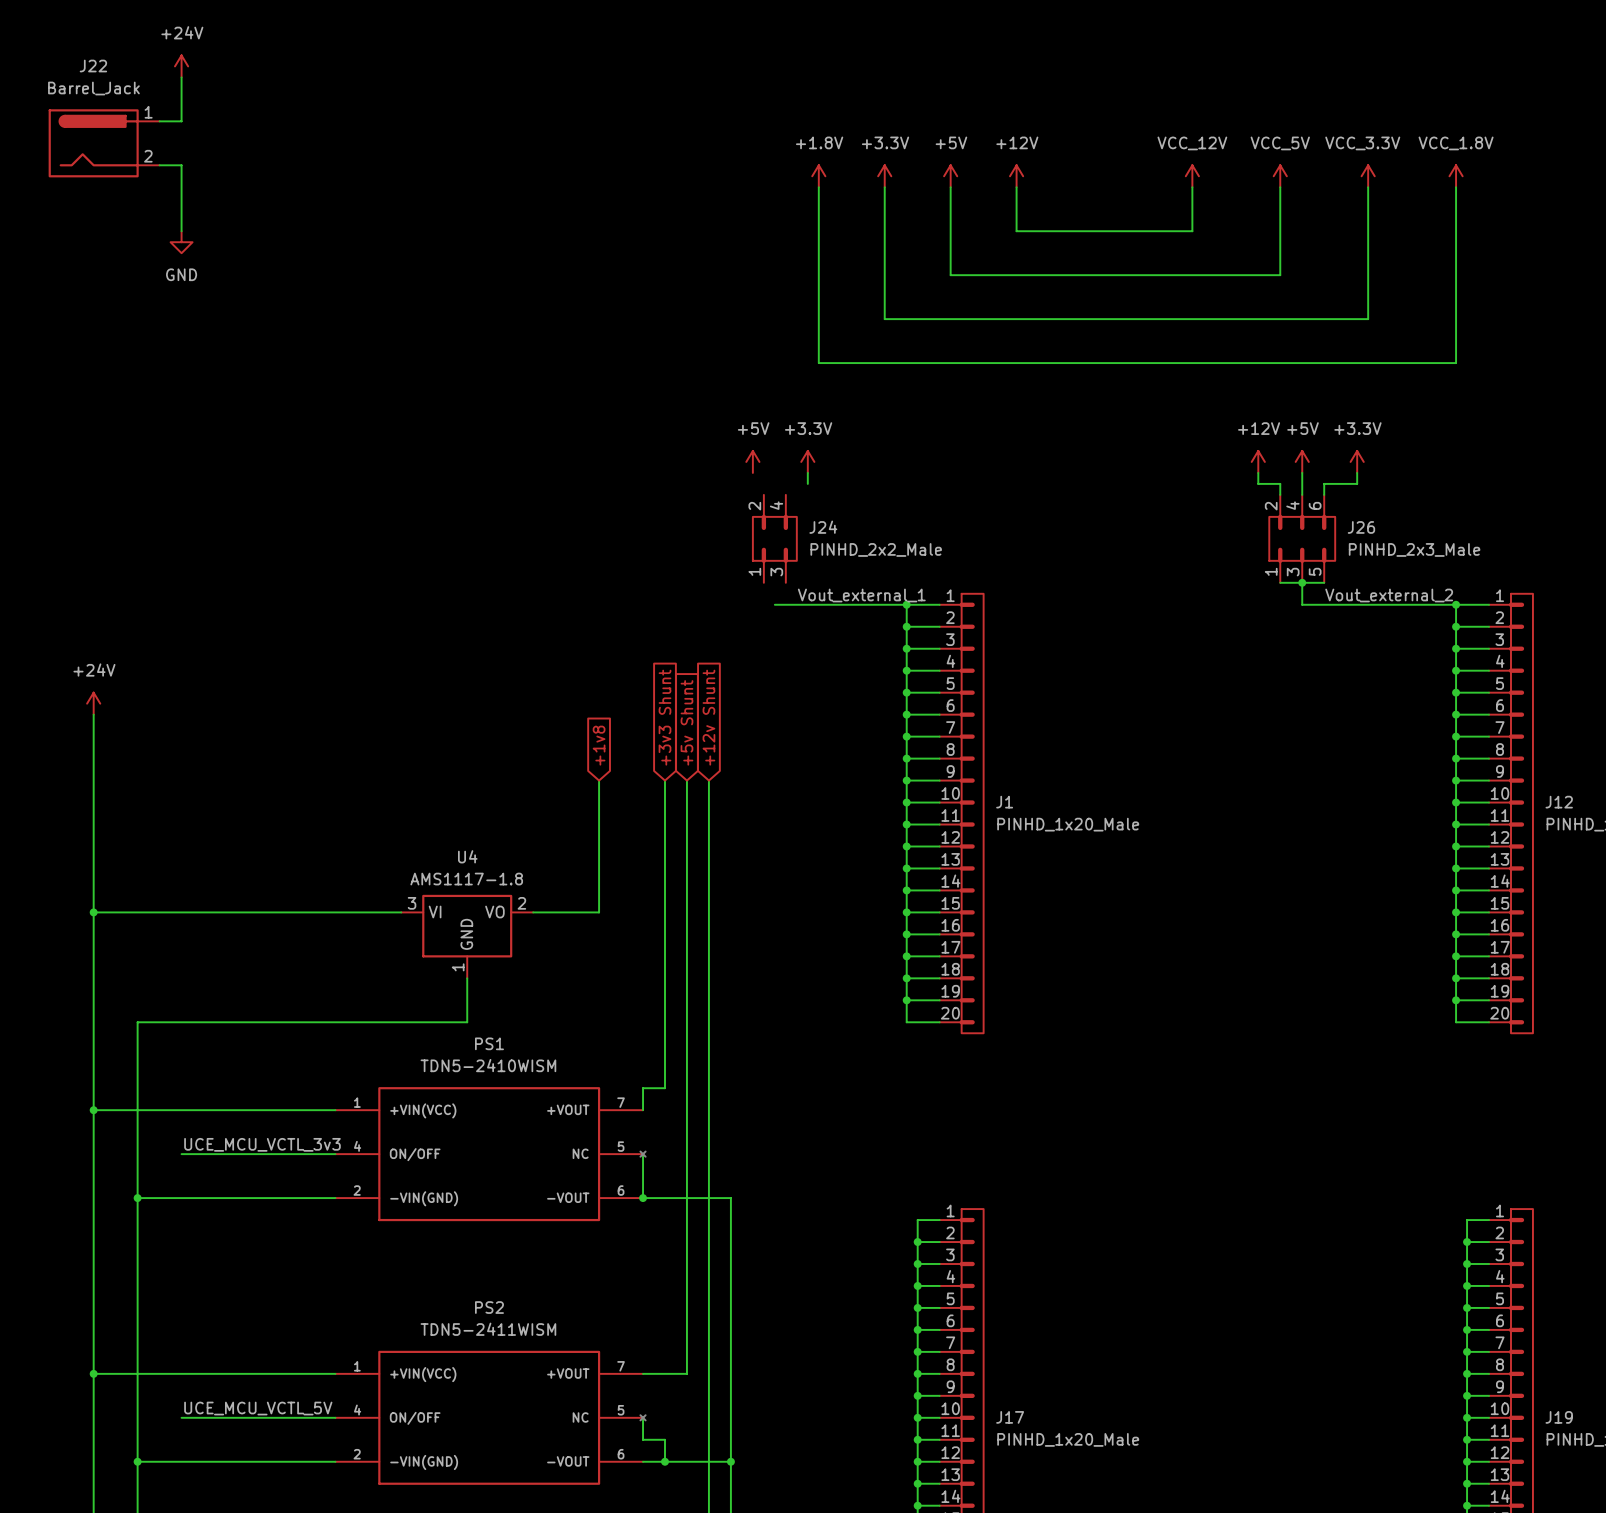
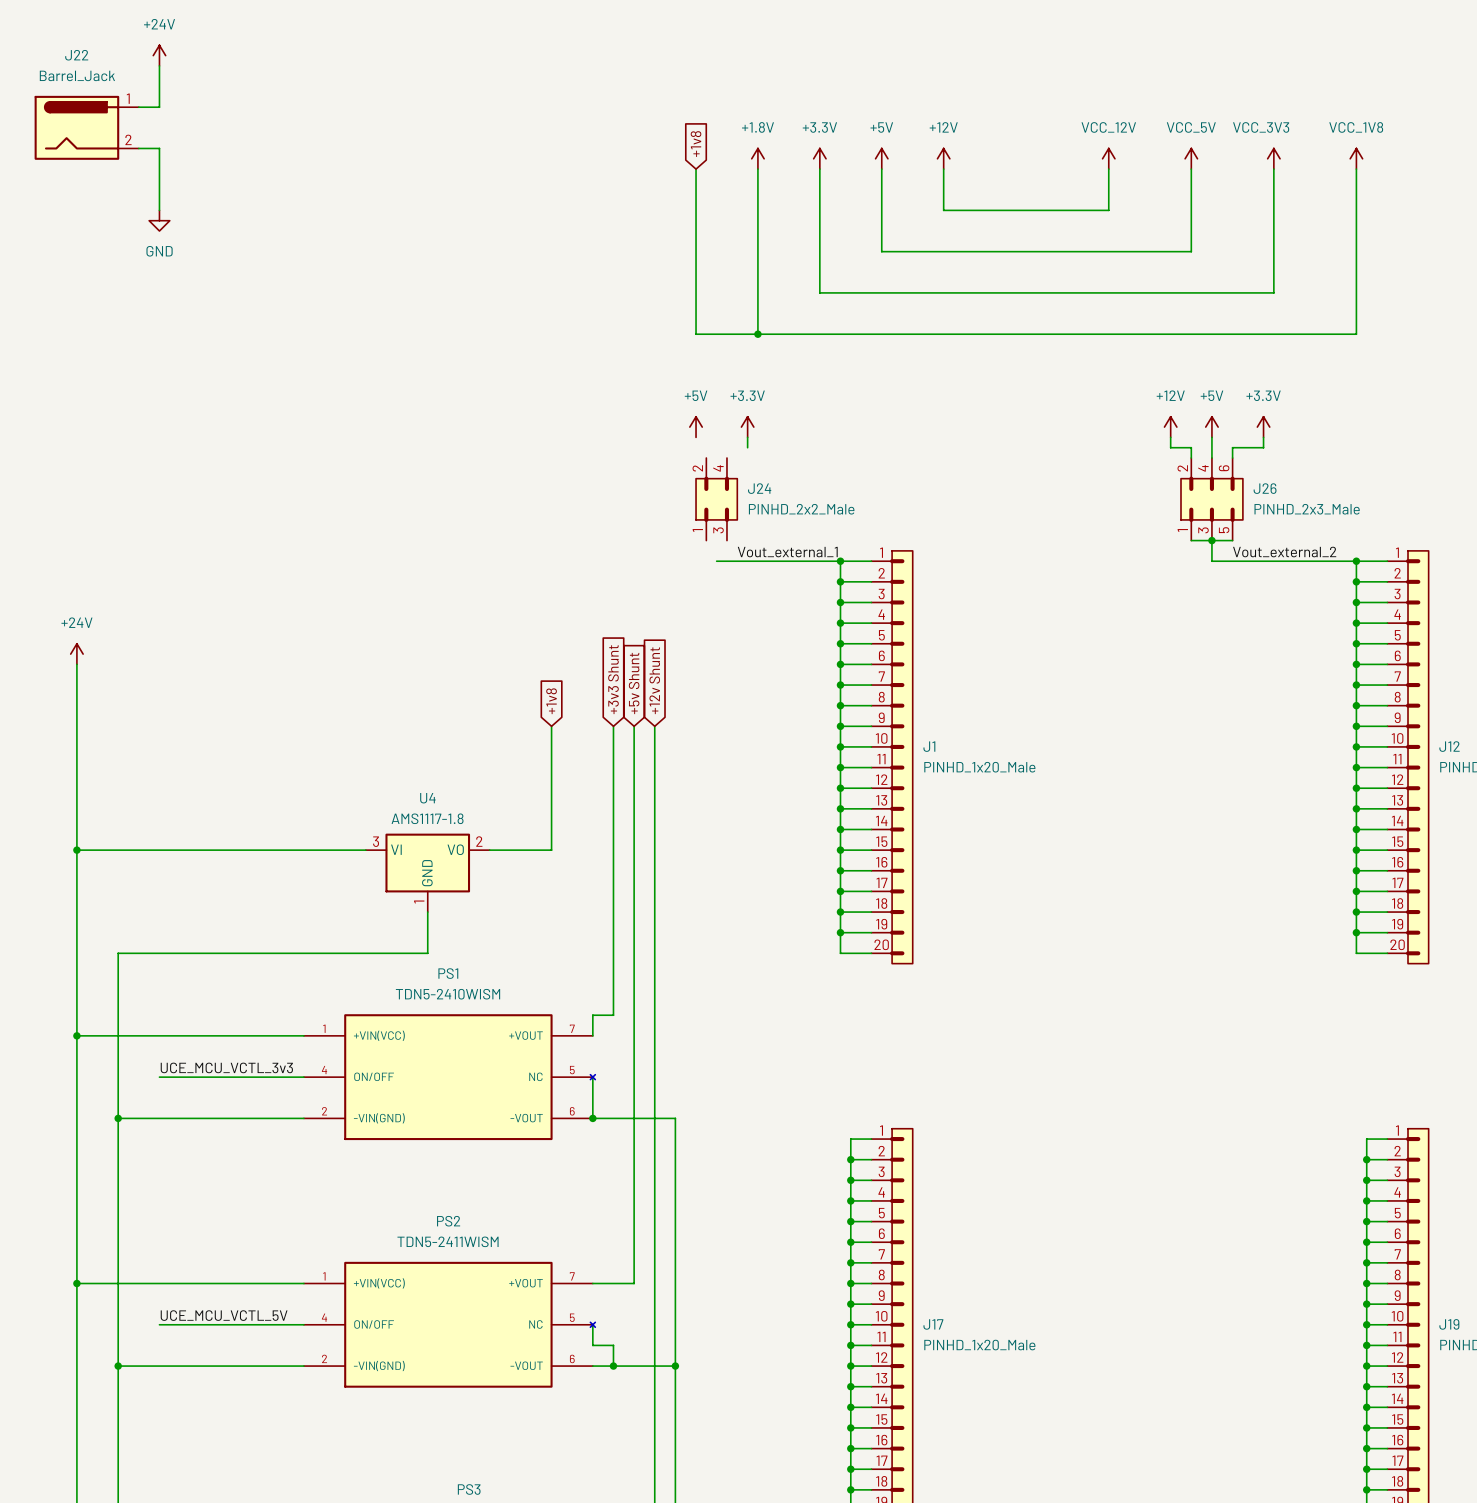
global label: none -> +1v8 (696, 144)
power symbol: VCC_3.3V (1368, 176) -> VCC_3V3 (1273, 158)
power symbol: VCC_1.8V (1456, 176) -> VCC_1V8 (1356, 158)
wire: none -> (696, 169) (696, 334) (757, 334)
junction: none -> (757, 334)

